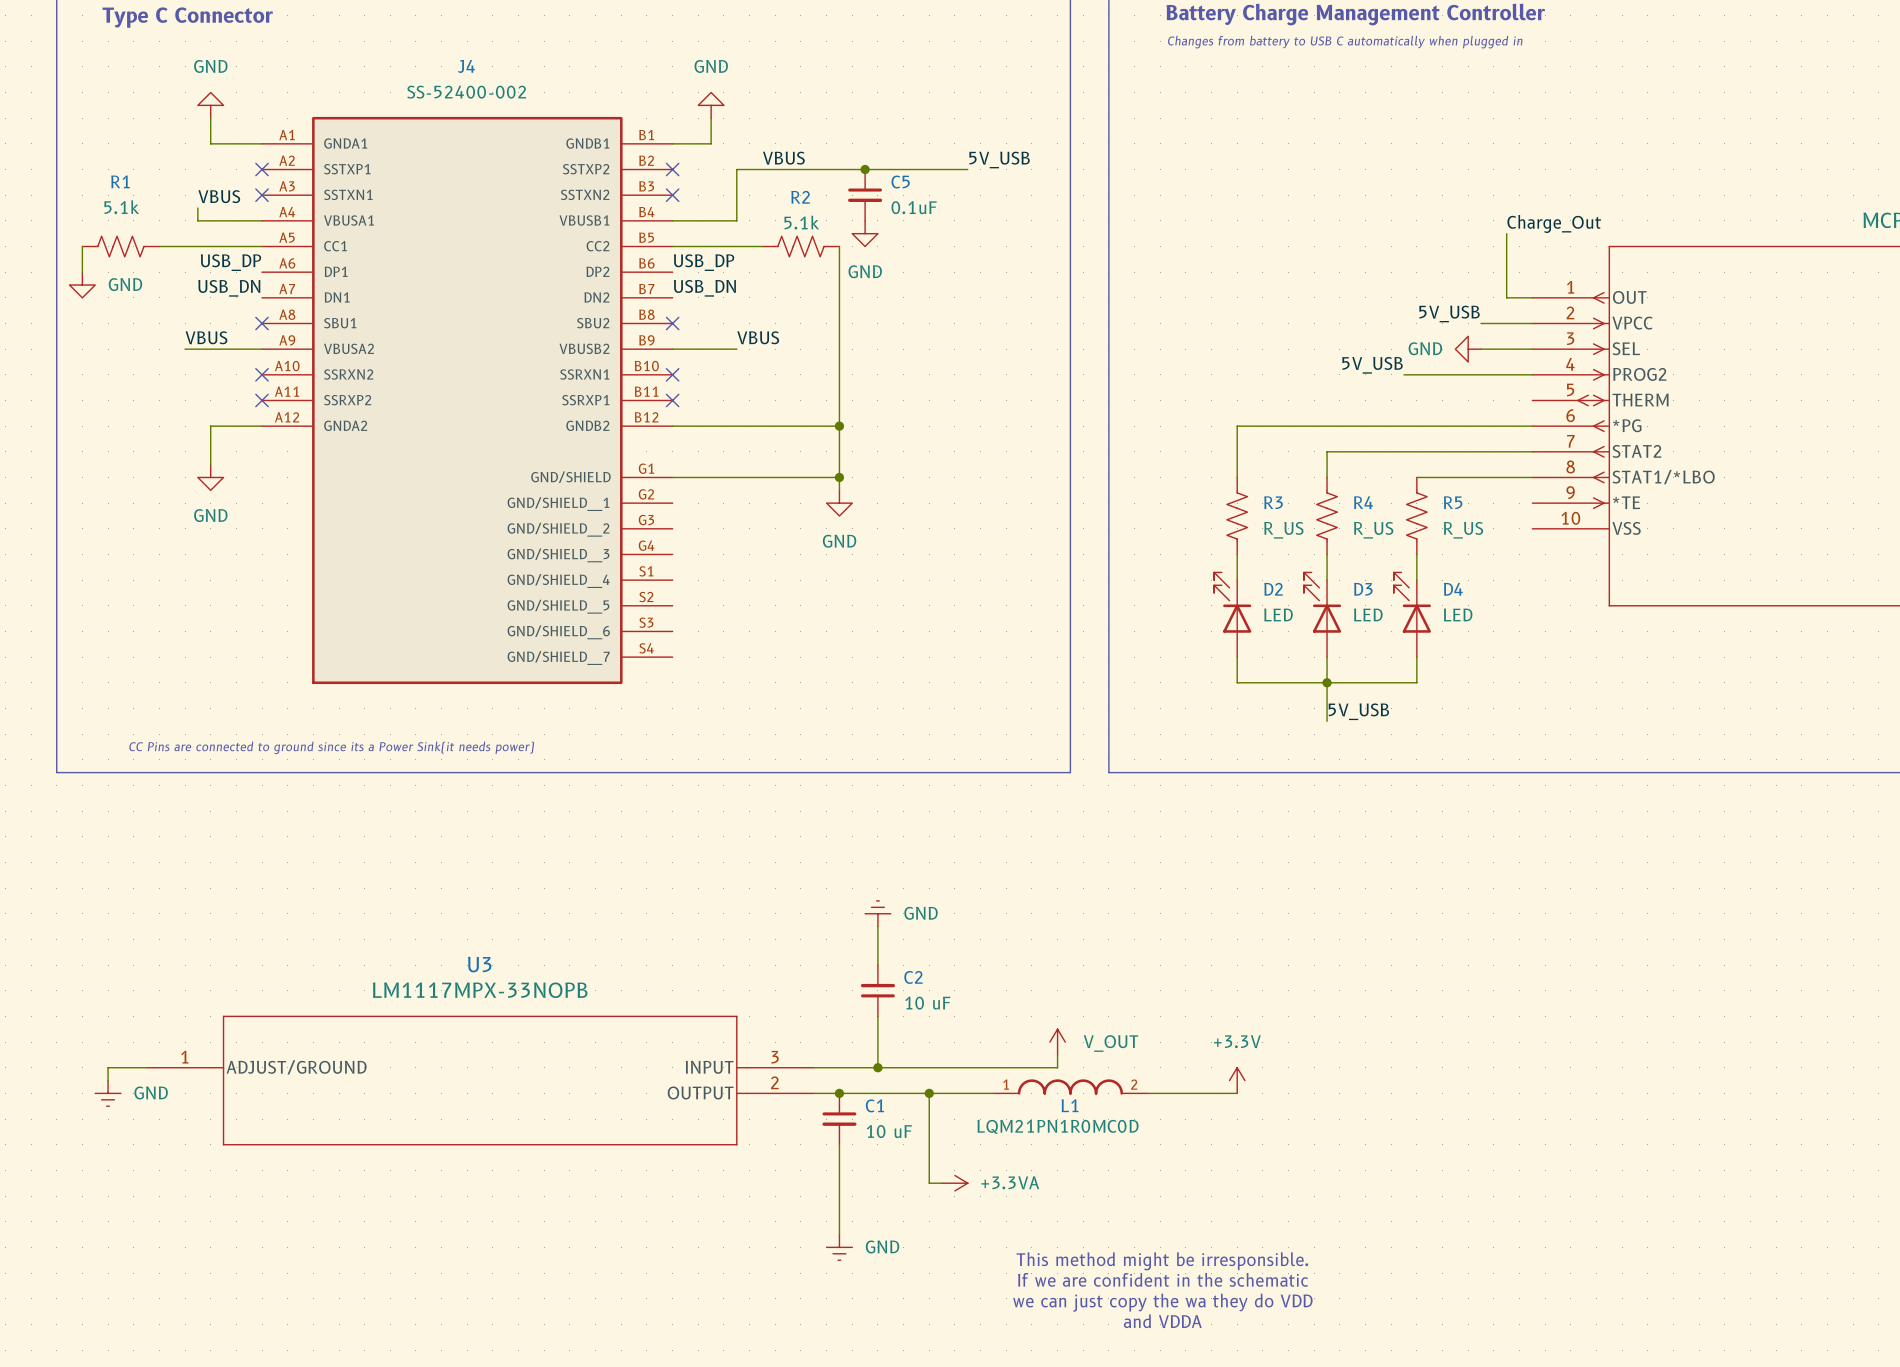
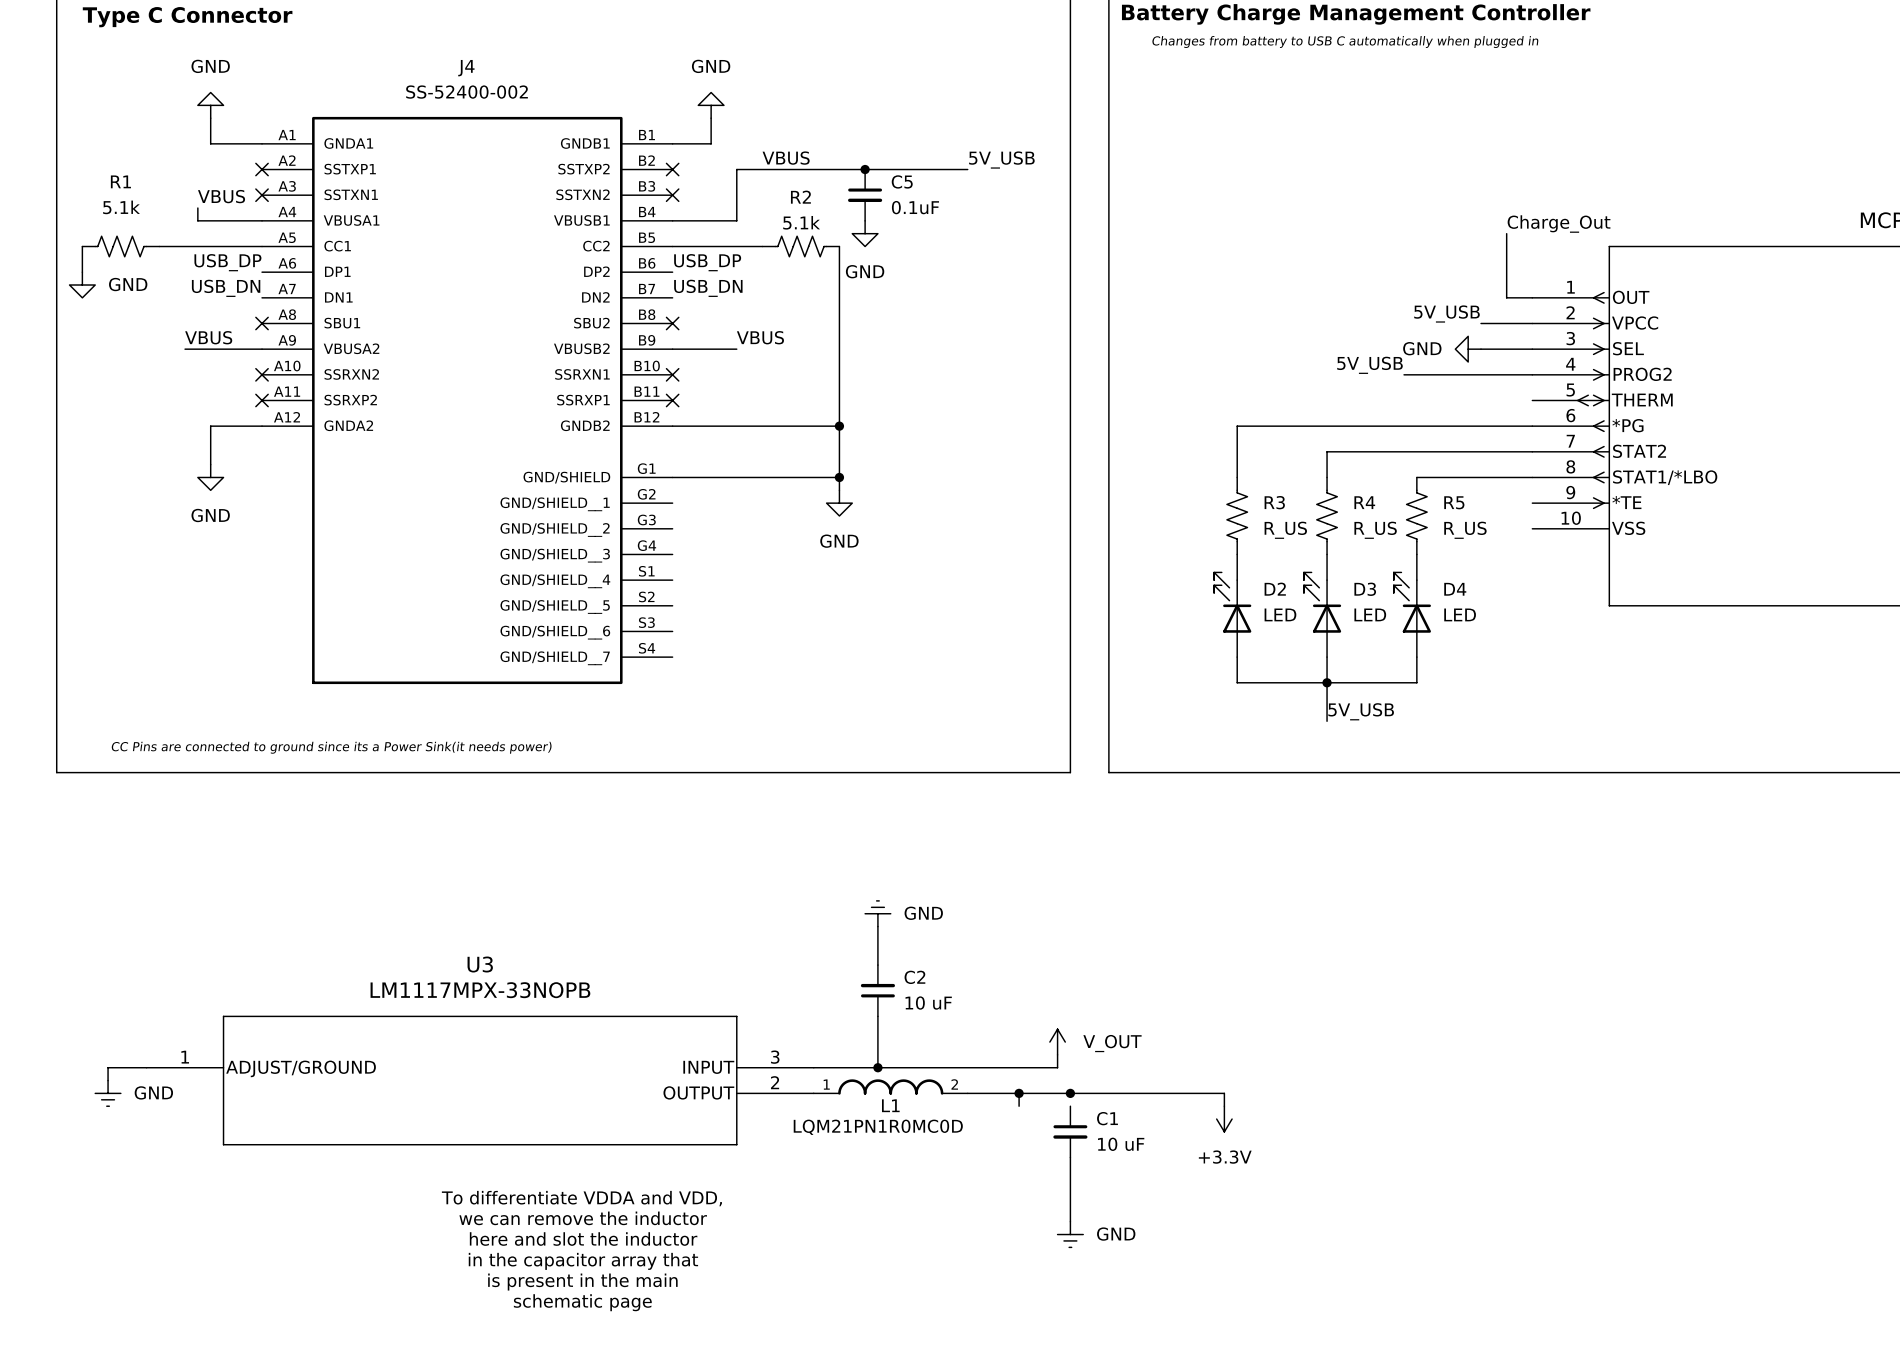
power symbol rotation: 0° (1237, 1080) -> 180° (1224, 1119)
power symbol position: +3.3V (1237, 1080) -> +3.3V (1224, 1119)
L1 position: (1070, 1087) -> (890, 1087)
wire: (813, 1093) (967, 1093) -> (993, 1093) (1147, 1093)
junction: (839, 1093) -> none
wire: (929, 1093) (929, 1183) (942, 1183) -> none
junction: (929, 1093) -> none
wire: none -> (1019, 1093) (1019, 1106)
junction: none -> (1019, 1093)
junction: none -> (1070, 1093)
wire: (1224, 1093) (1237, 1093) -> (1224, 1093) (1224, 1106)
C1 position: (839, 1119) -> (1070, 1131)
wire: (839, 1144) (839, 1234) -> none
wire: none -> (1070, 1157) (1070, 1221)
power symbol: +3.3VA (954, 1183) -> none
text: none -> To differentiate VDDA and VDD, (581, 1198)
text: none -> we can remove the inductor (583, 1218)
text: none -> here and slot the inductor (583, 1239)
power symbol position: GND (839, 1247) -> GND (1070, 1234)
text: none -> in the capacitor array that (583, 1261)
text: This method might be irresponsible. (1162, 1261) -> none
text: If we are confident in the schematic (1163, 1279) -> none
text: none -> is present in the main (582, 1282)
text: none -> schematic page (582, 1302)
text: we can just copy the wa they do VDD (1162, 1302) -> none
text: and VDDA (1162, 1321) -> none

